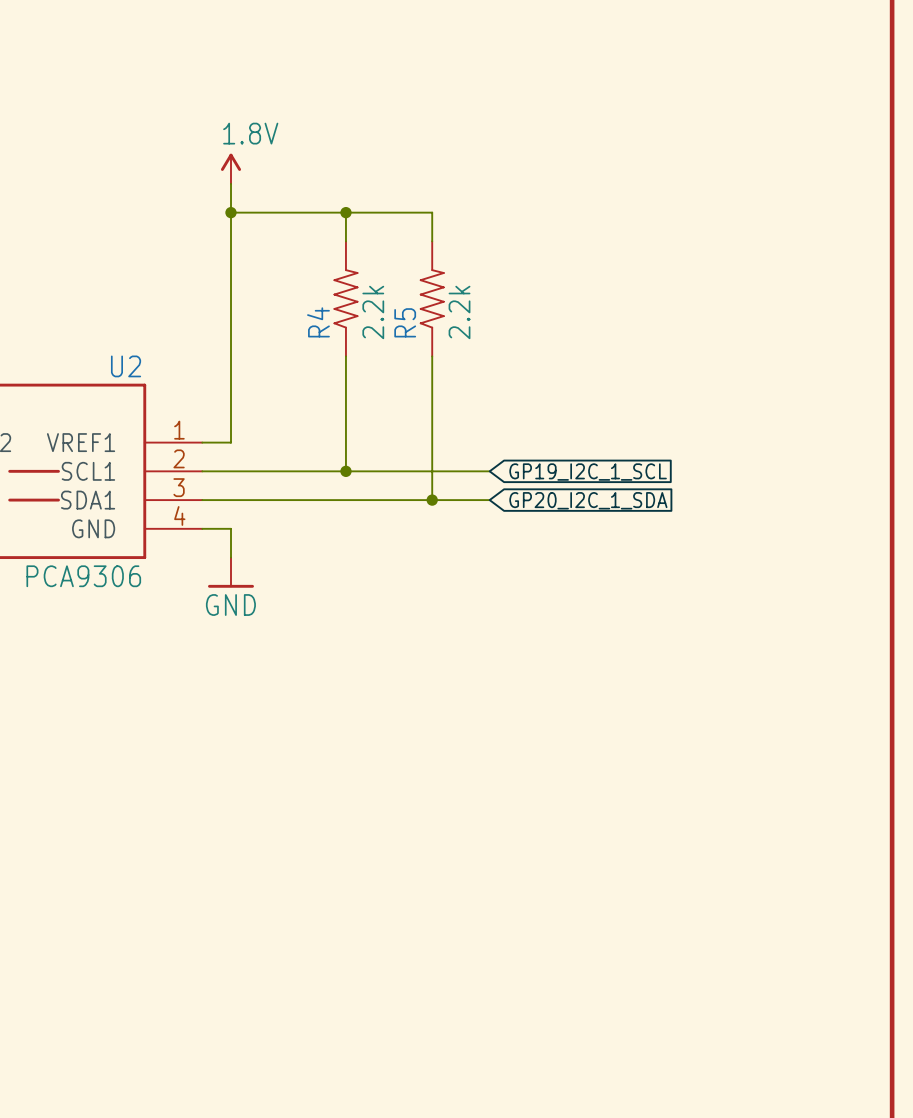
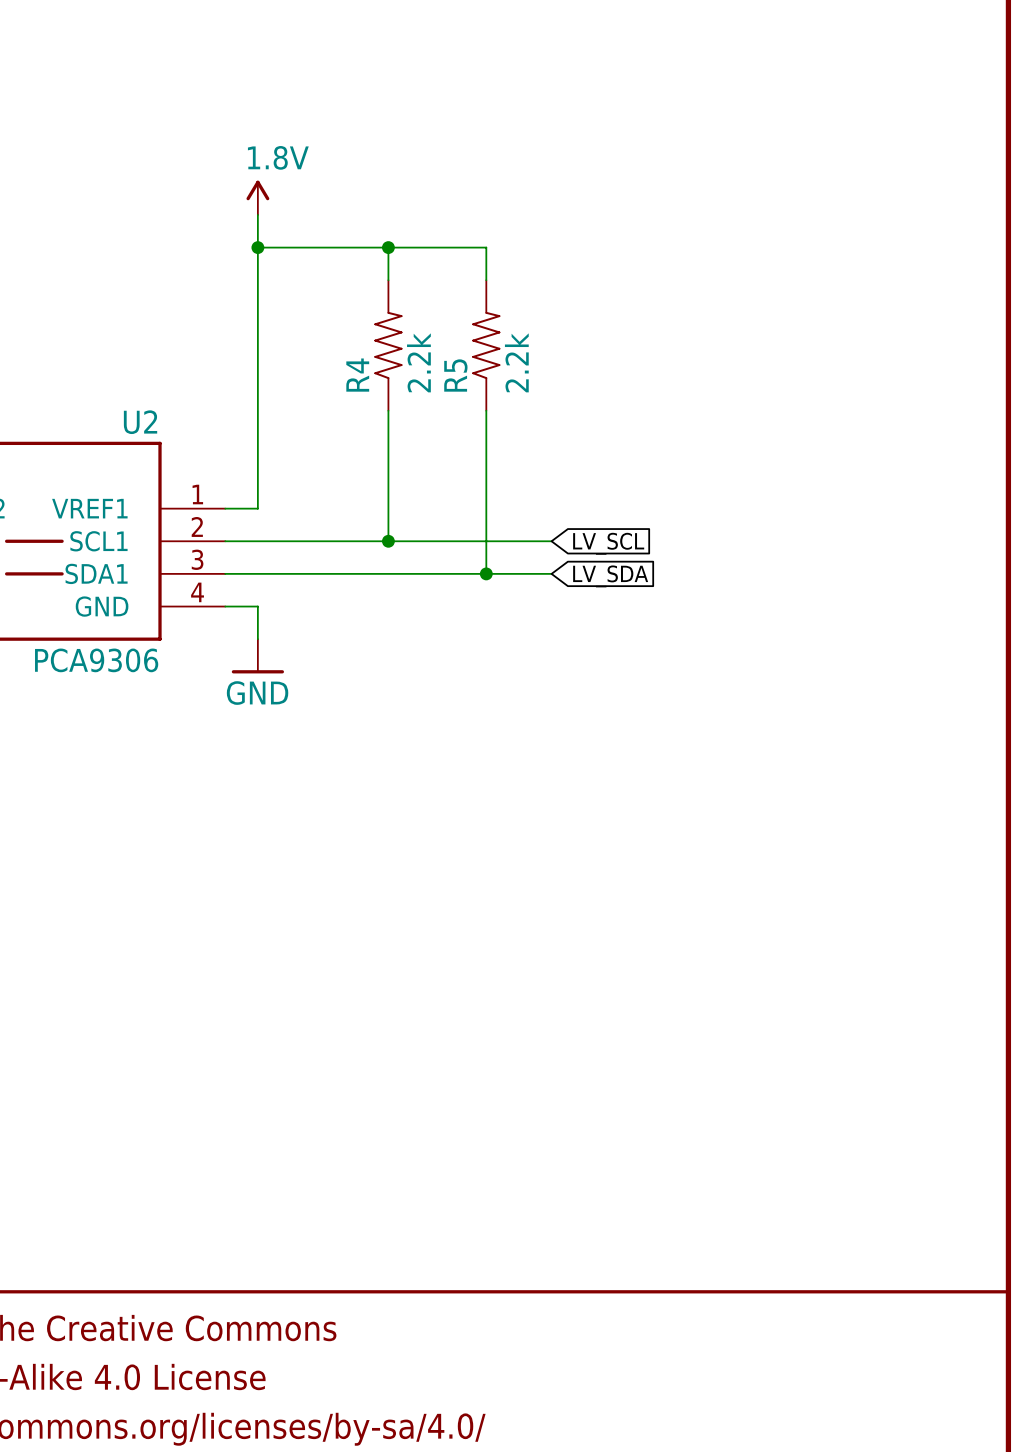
global label: GP19_I2C_1_SCL (588, 472) -> LV_SCL (608, 543)
global label: GP20_I2C_1_SDA (588, 500) -> LV_SDA (610, 576)

